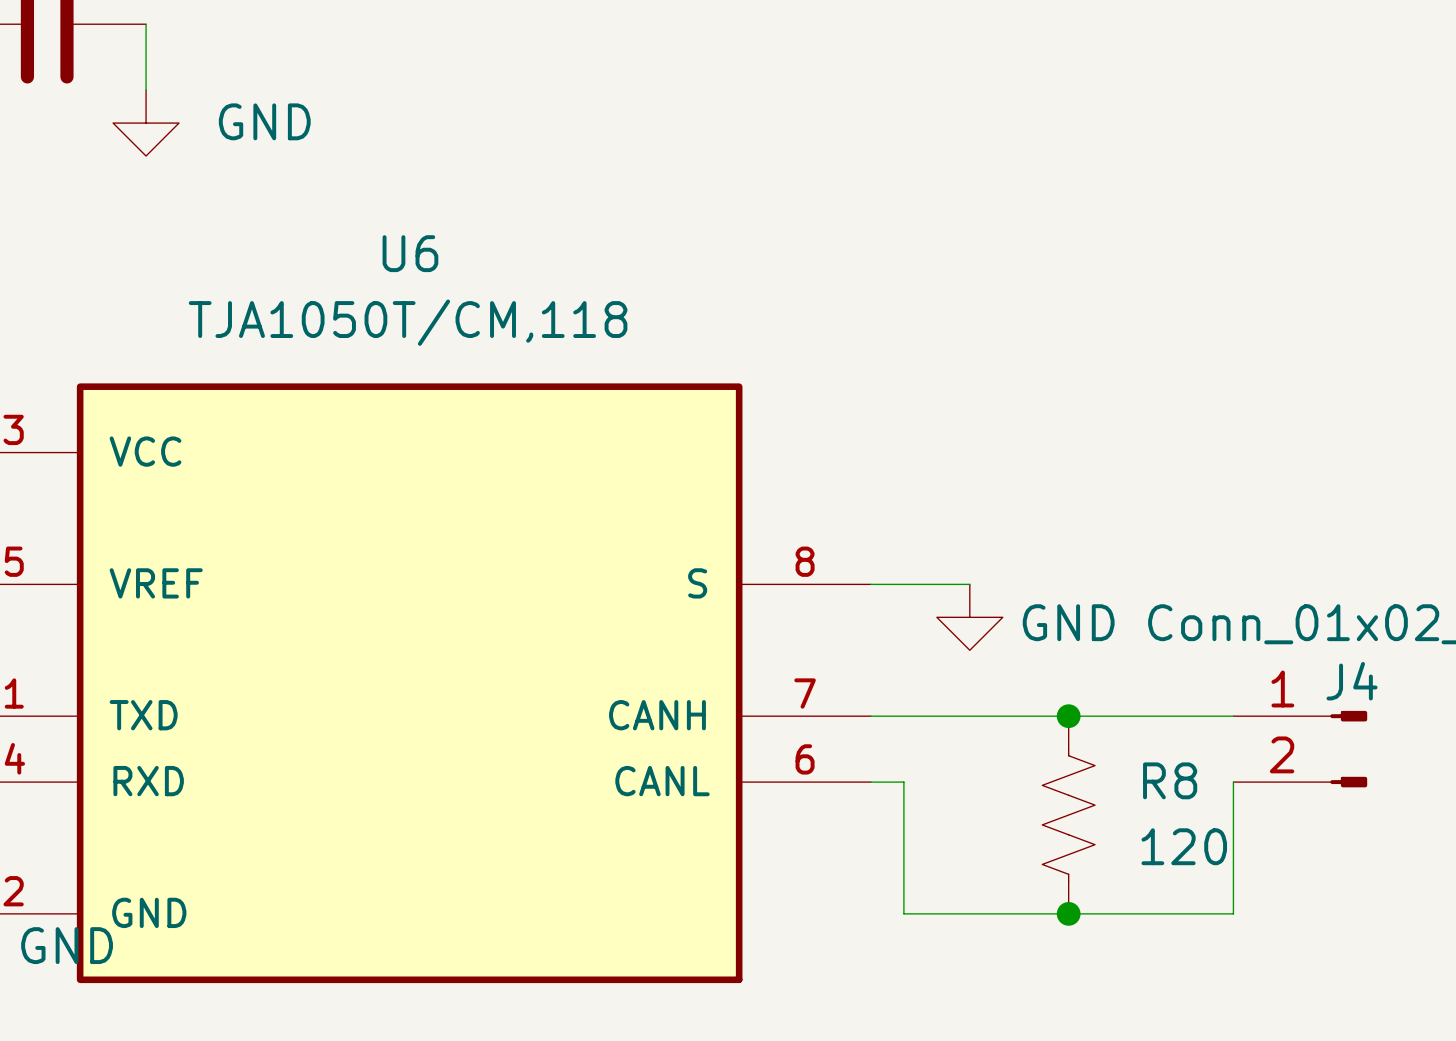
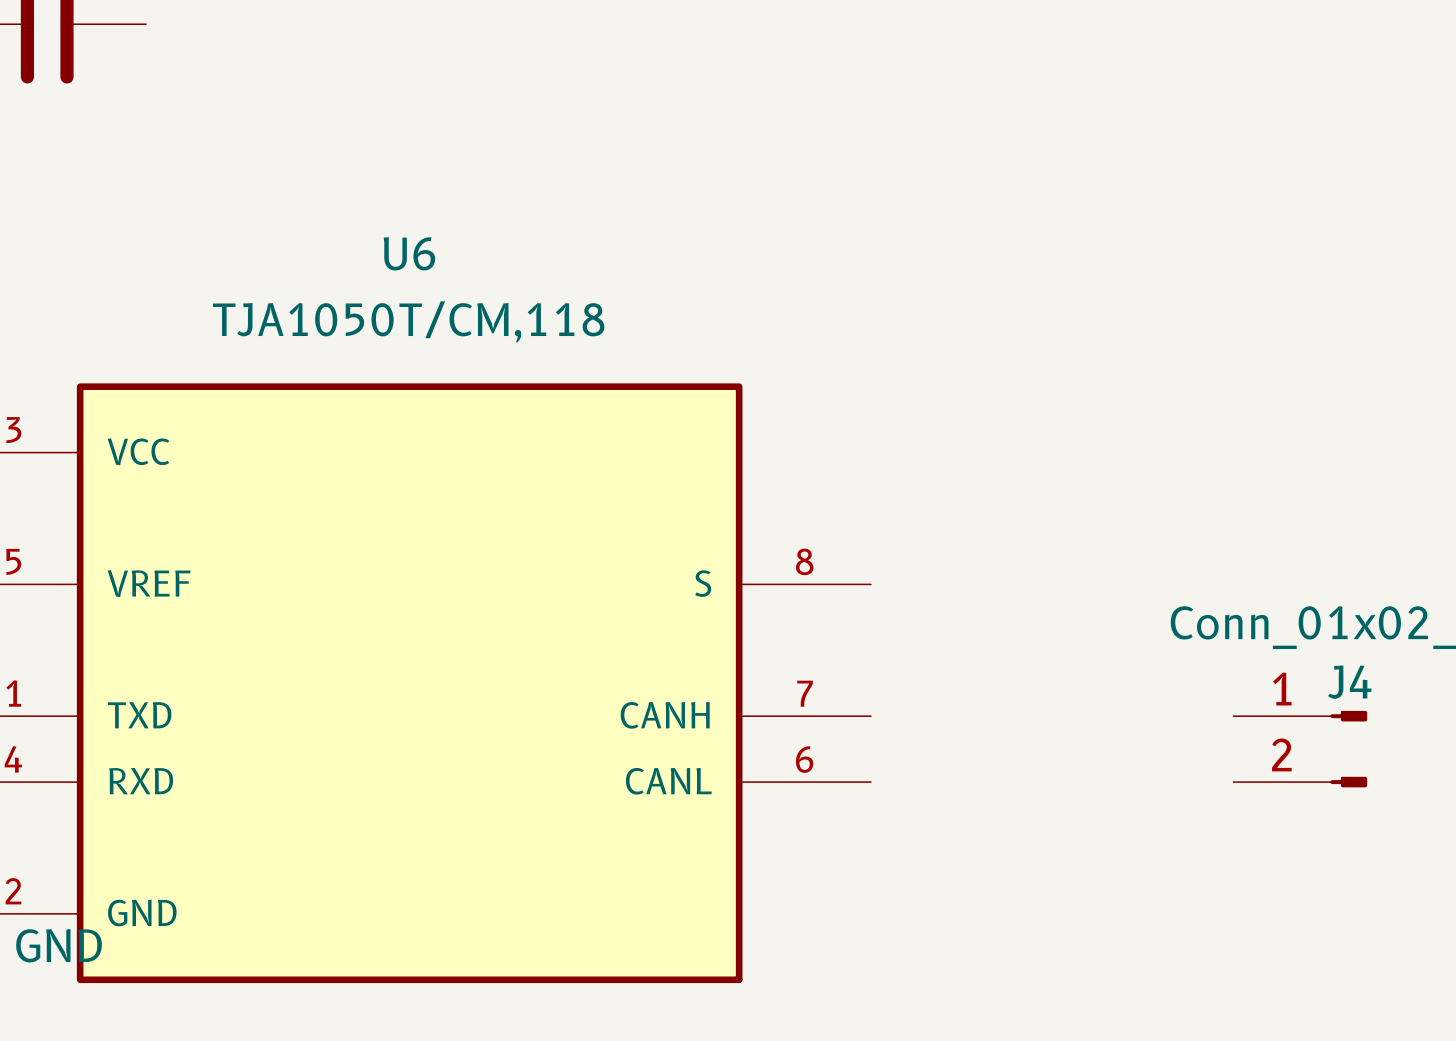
wire: (146, 24) (146, 90) -> none
power symbol: GND (146, 123) -> none
wire: (870, 584) (969, 584) -> none
power symbol: GND (969, 617) -> none
wire: (870, 716) (1233, 716) -> none
junction: (1068, 716) -> none
wire: (870, 782) (903, 782) (903, 913) (1233, 913) (1233, 782) -> none
R8: 120 (1068, 815) -> none
junction: (1068, 913) -> none

